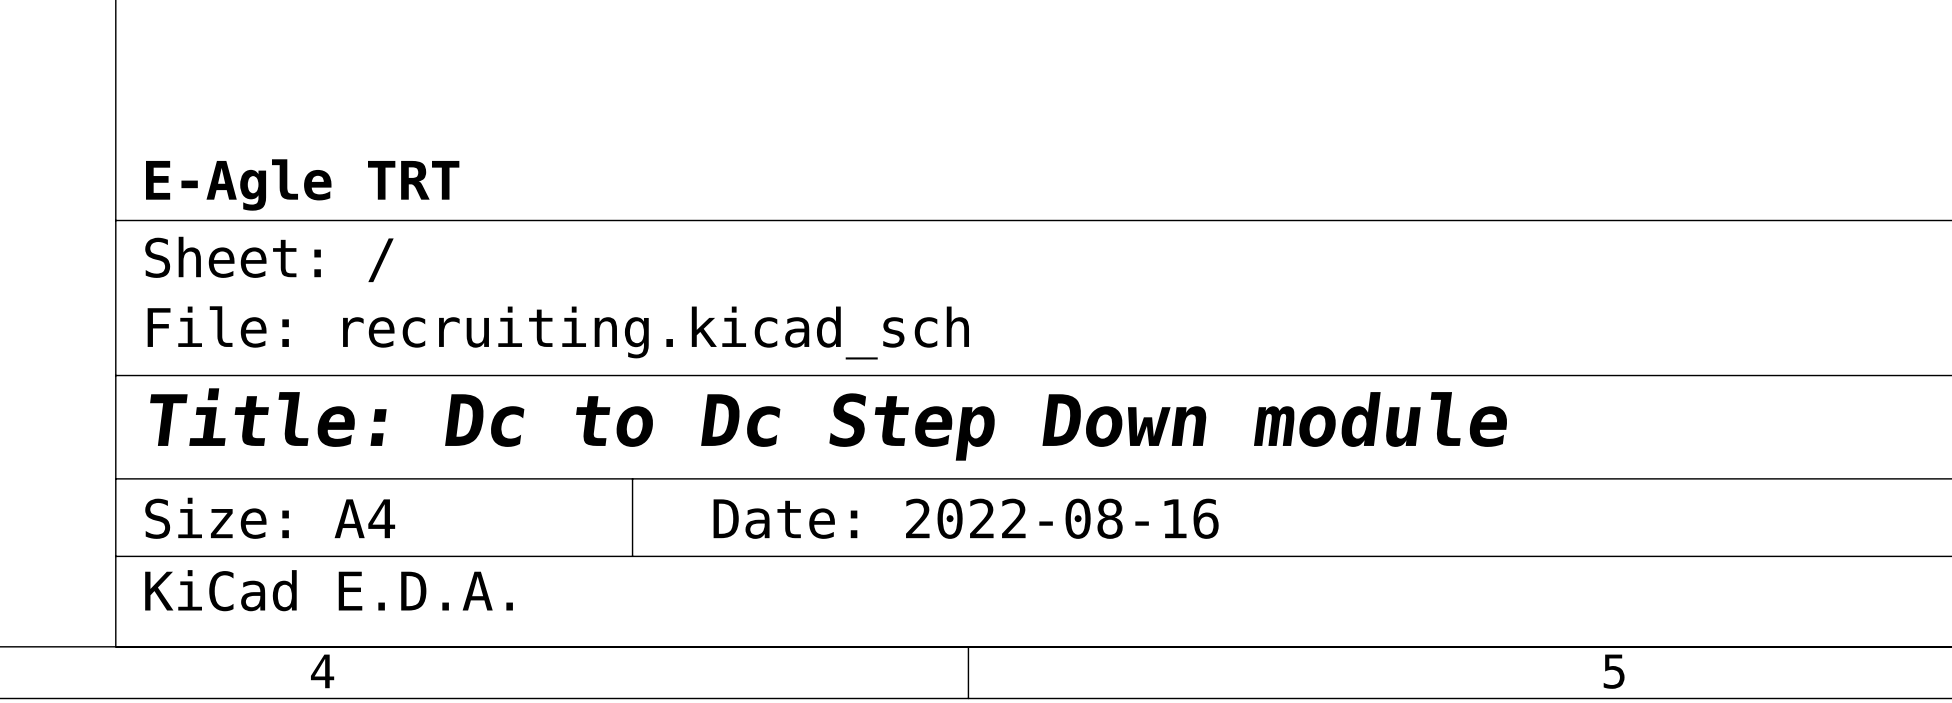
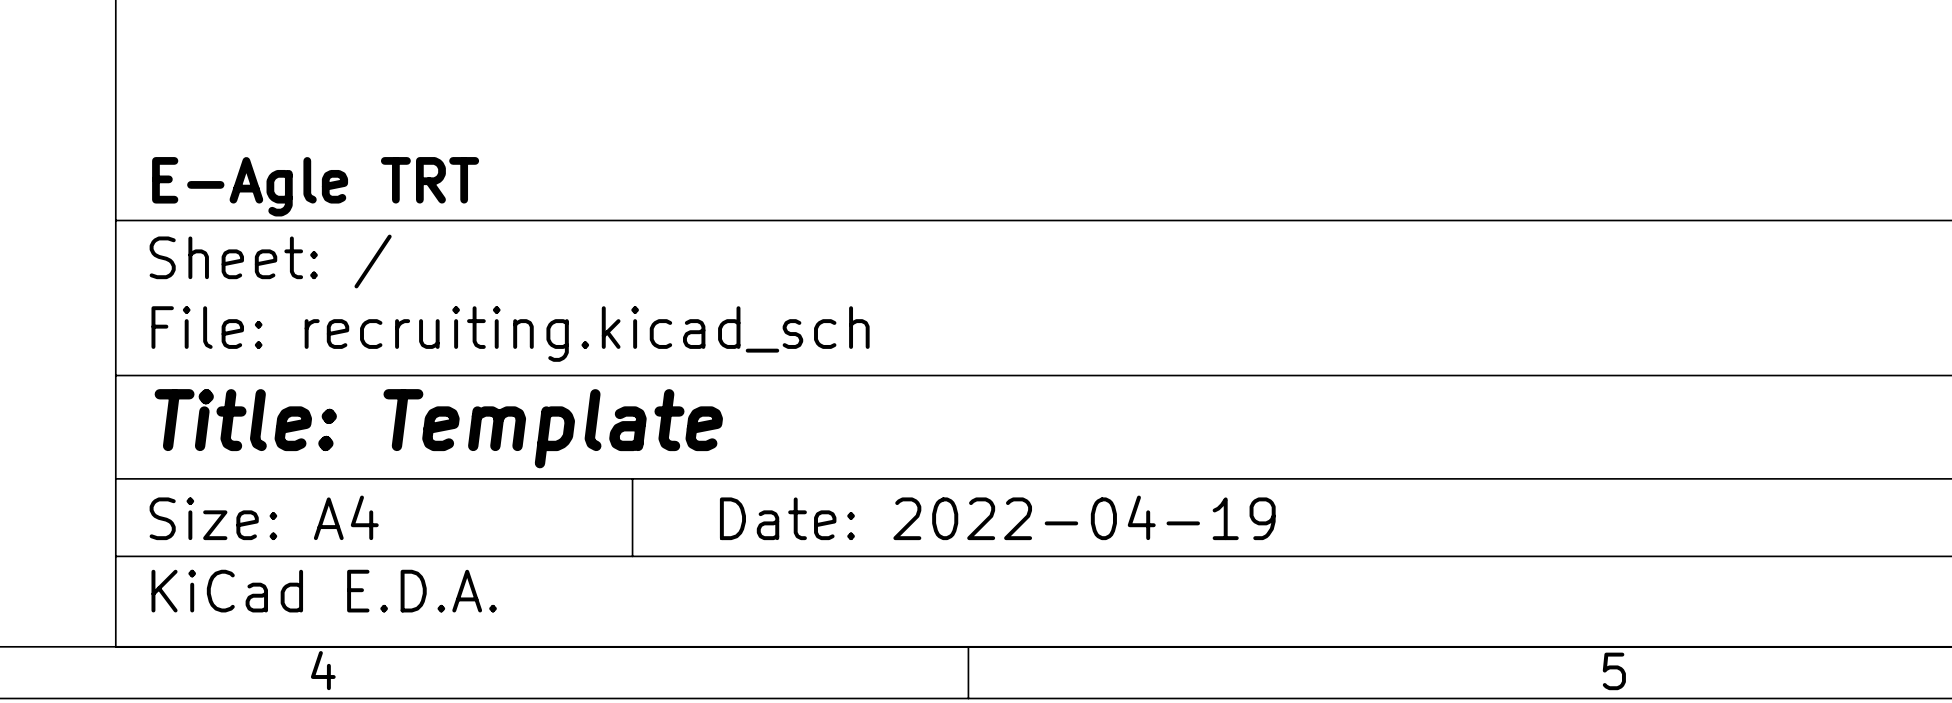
title block: Title: Dc to Dc Step Down module (829, 424) -> Title: Template (438, 428)
title block: Date: 2022-08-16 (966, 518) -> Date: 2022-04-19 (997, 517)

